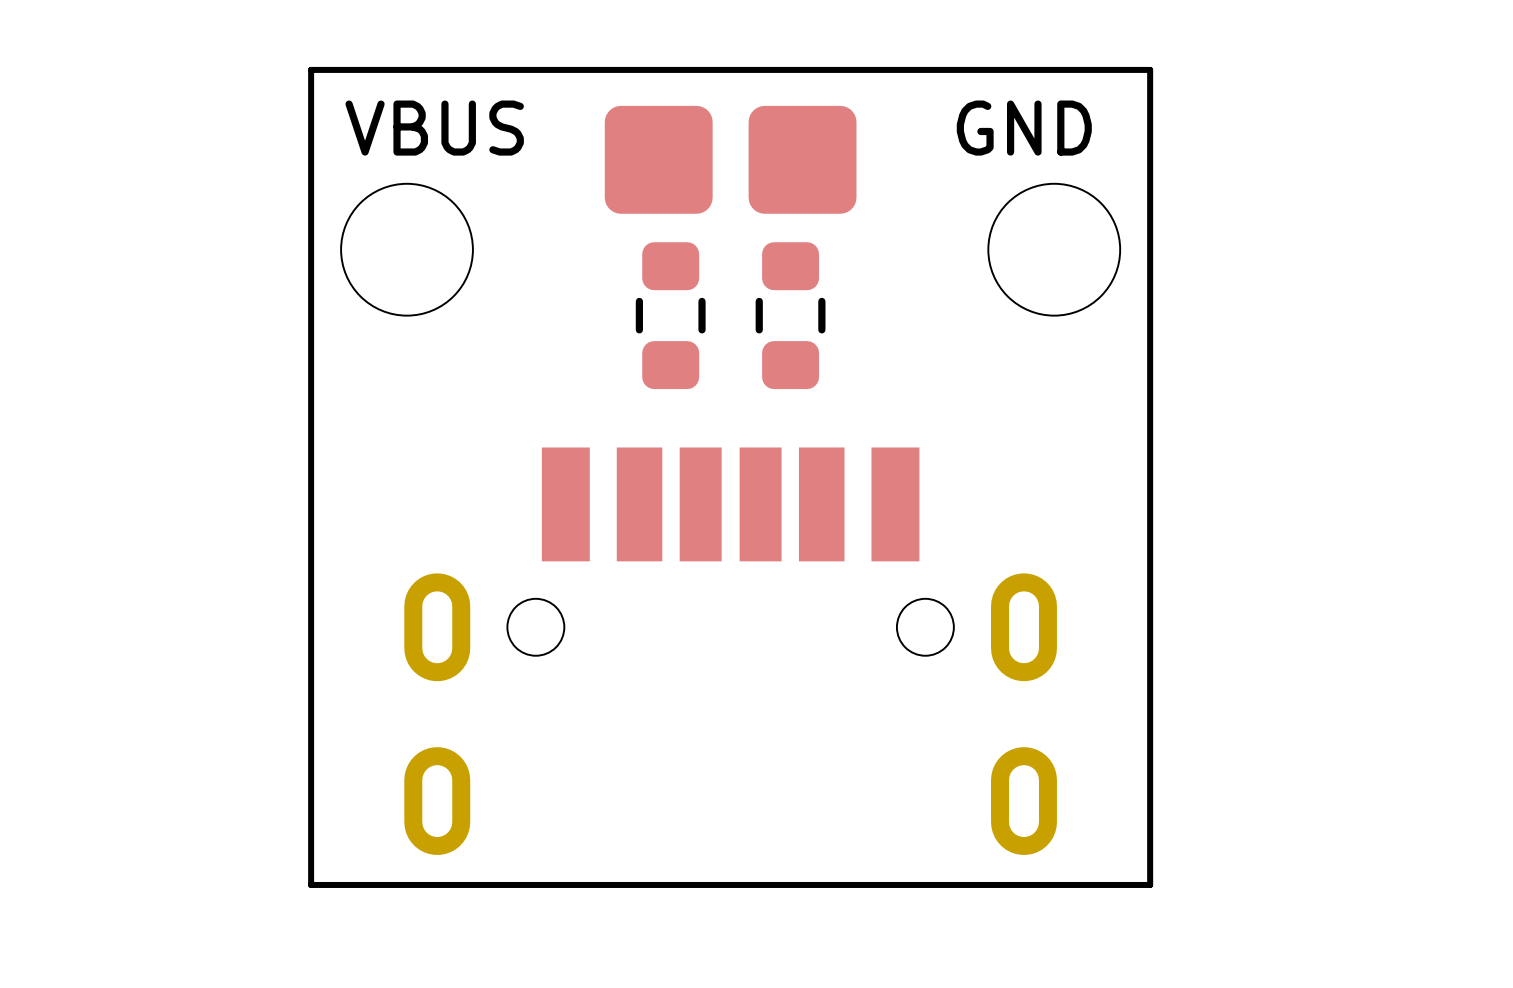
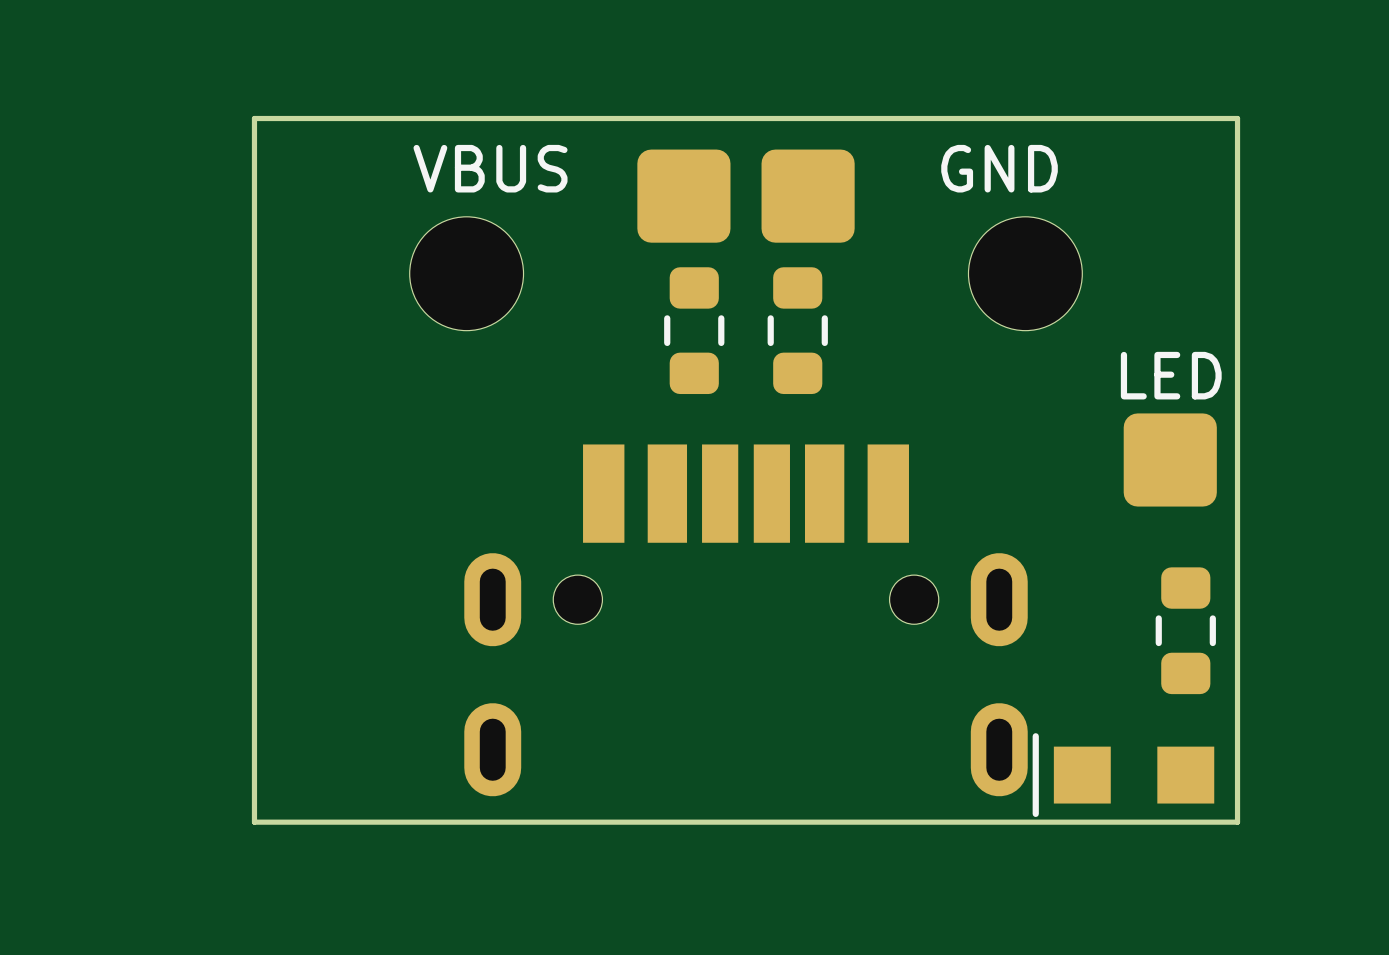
board edge: (311, 69) (311, 884) -> (383, 118) (254, 118) (254, 822) (383, 822)
board edge: (1150, 69) (1150, 884) -> (1108, 118) (1237, 118) (1237, 822) (1108, 822)
text: none -> LED (1171, 375)
part: none -> (1170, 459)
part: none -> (1185, 630)
part: none -> (1123, 775)

